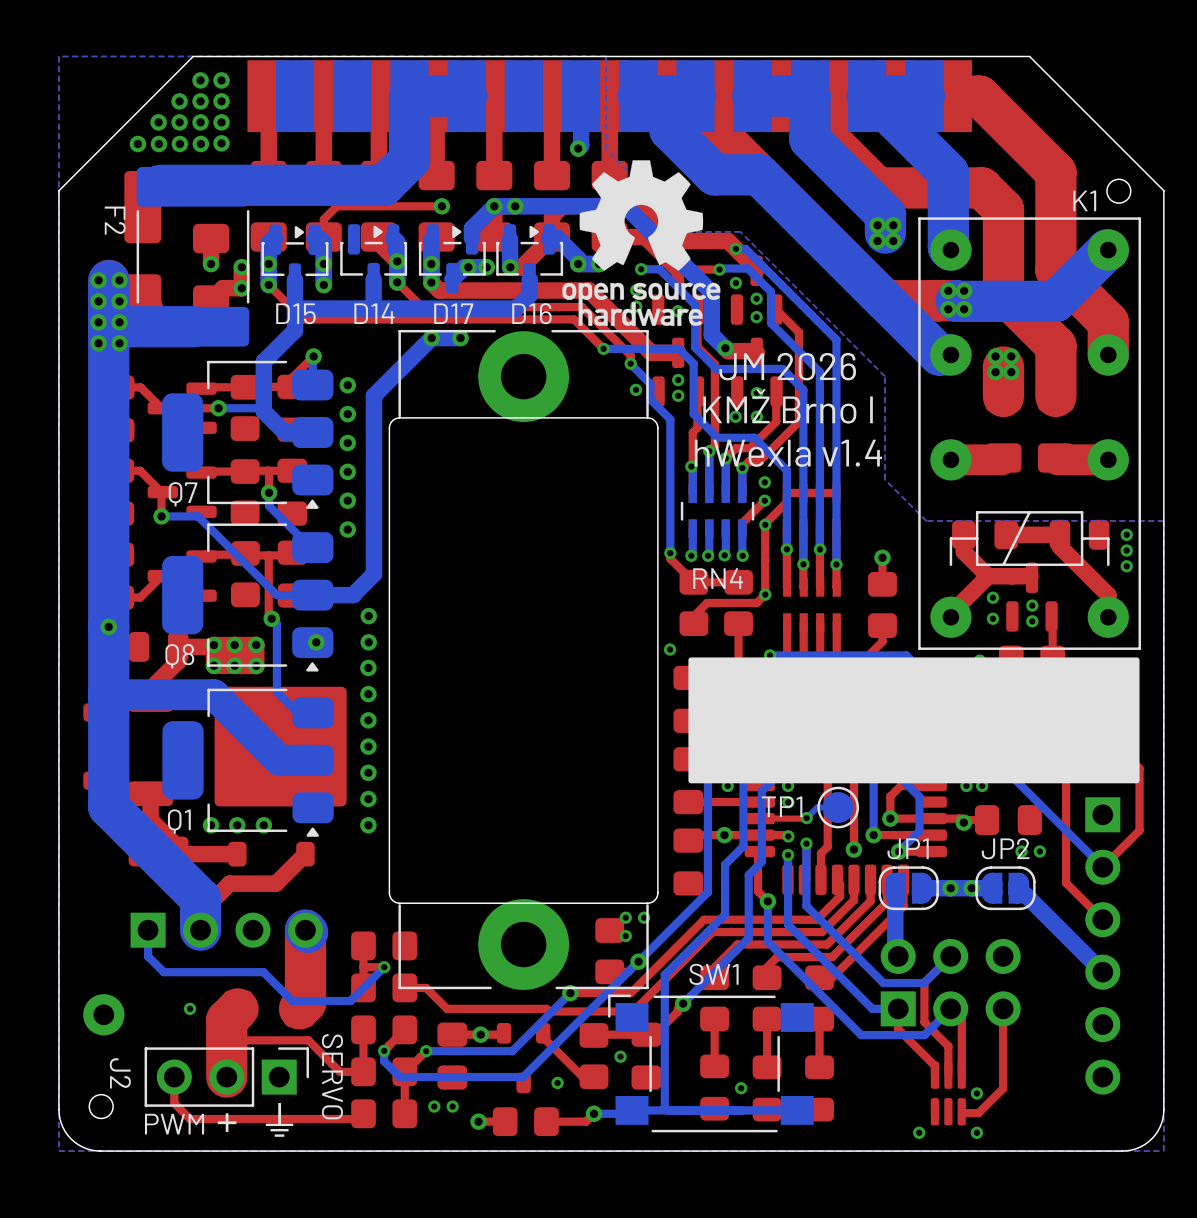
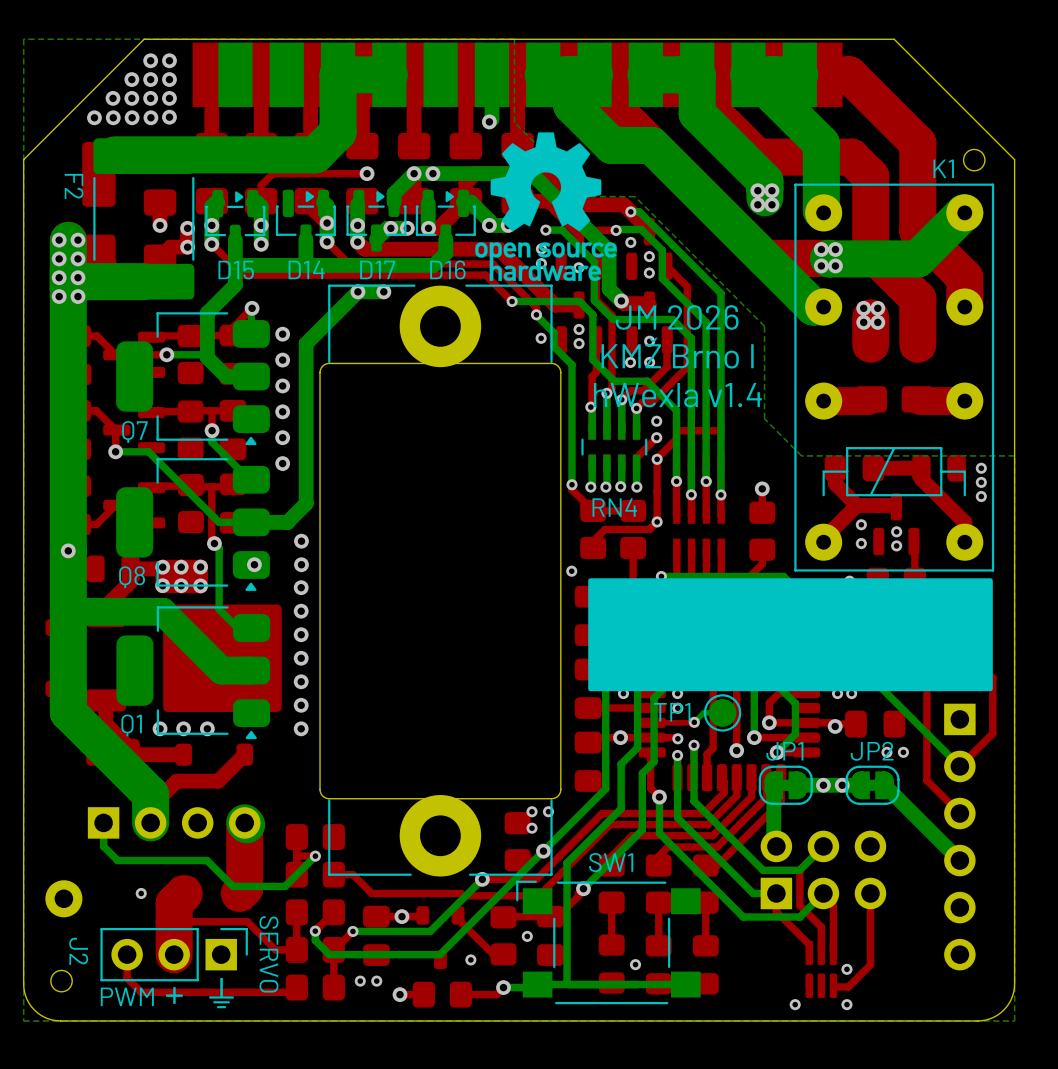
JP1 footprint: [878, 866, 939, 911] -> [758, 765, 813, 805]
JP2 footprint: [975, 866, 1036, 911] -> [845, 765, 900, 805]

